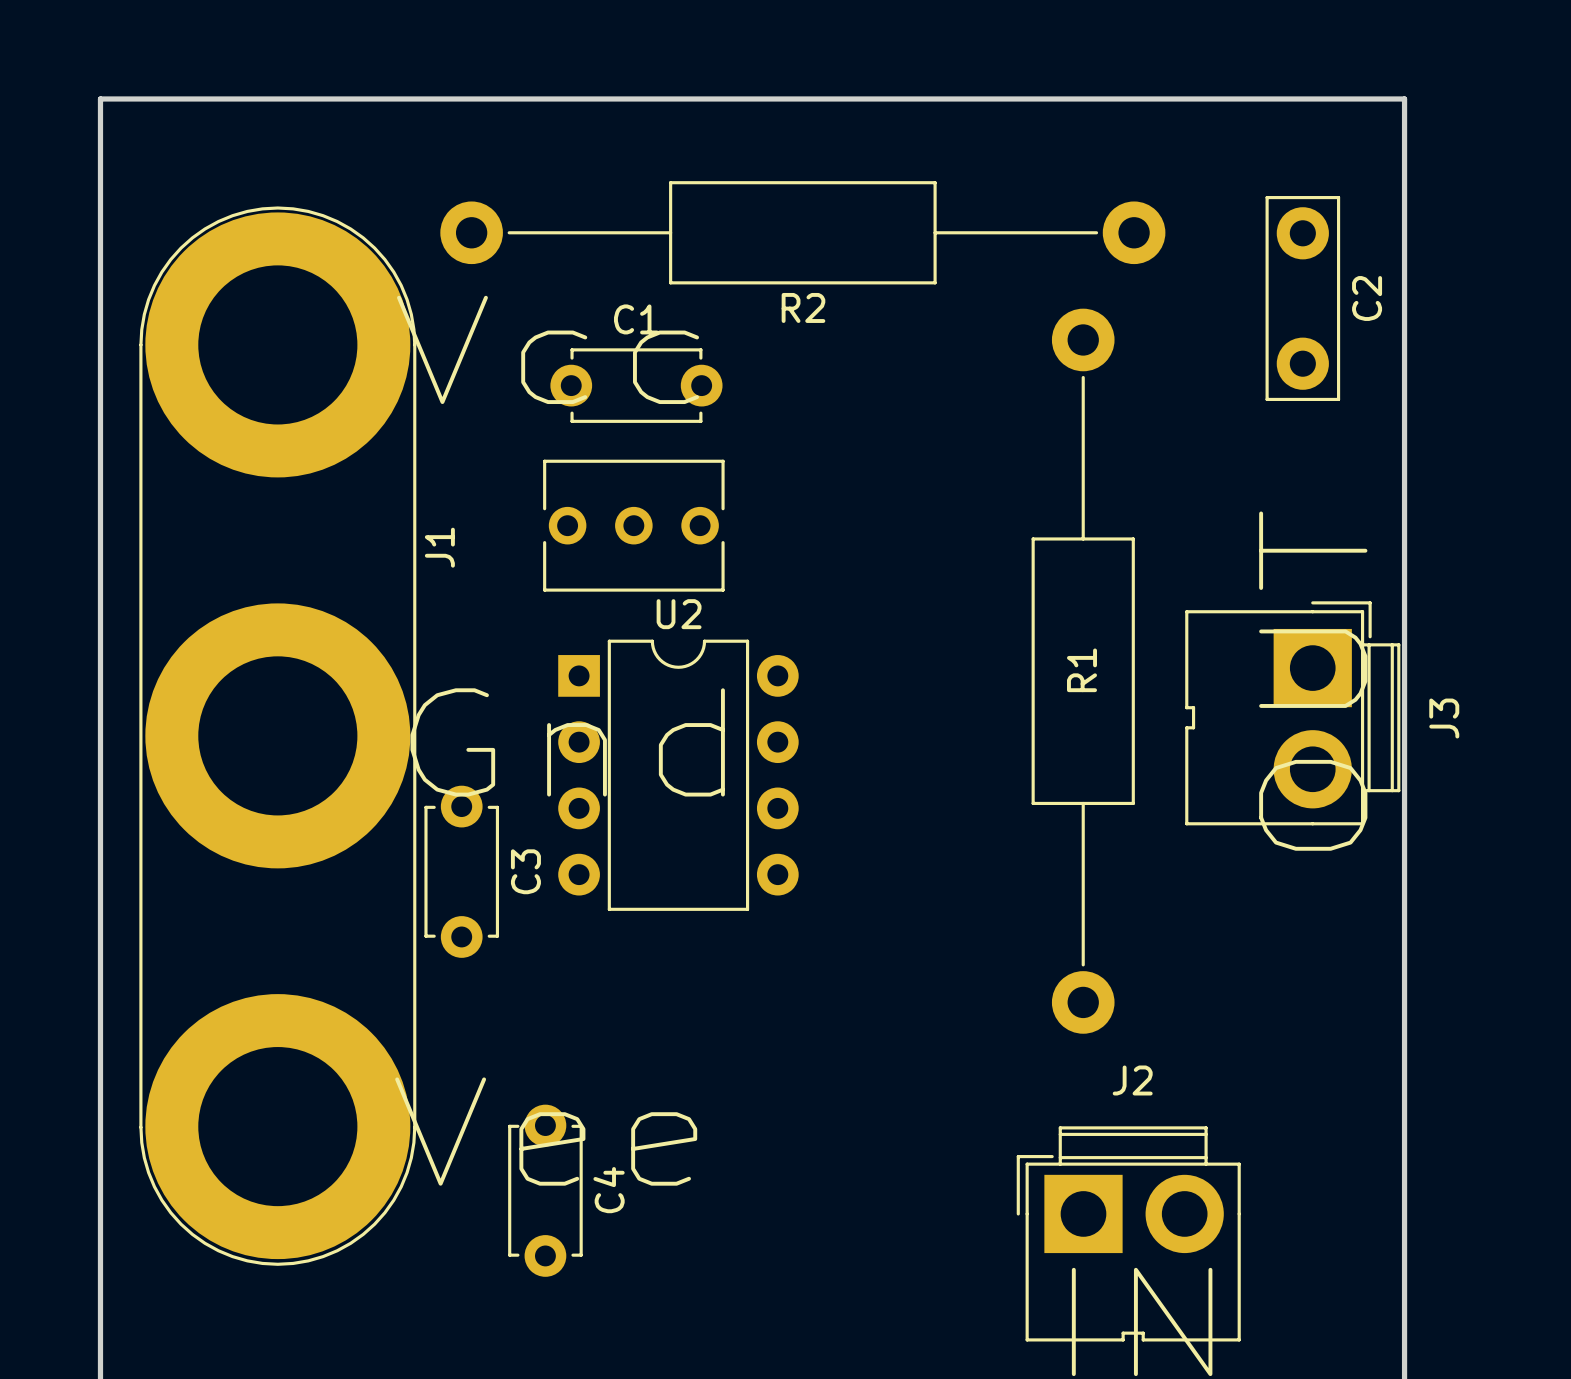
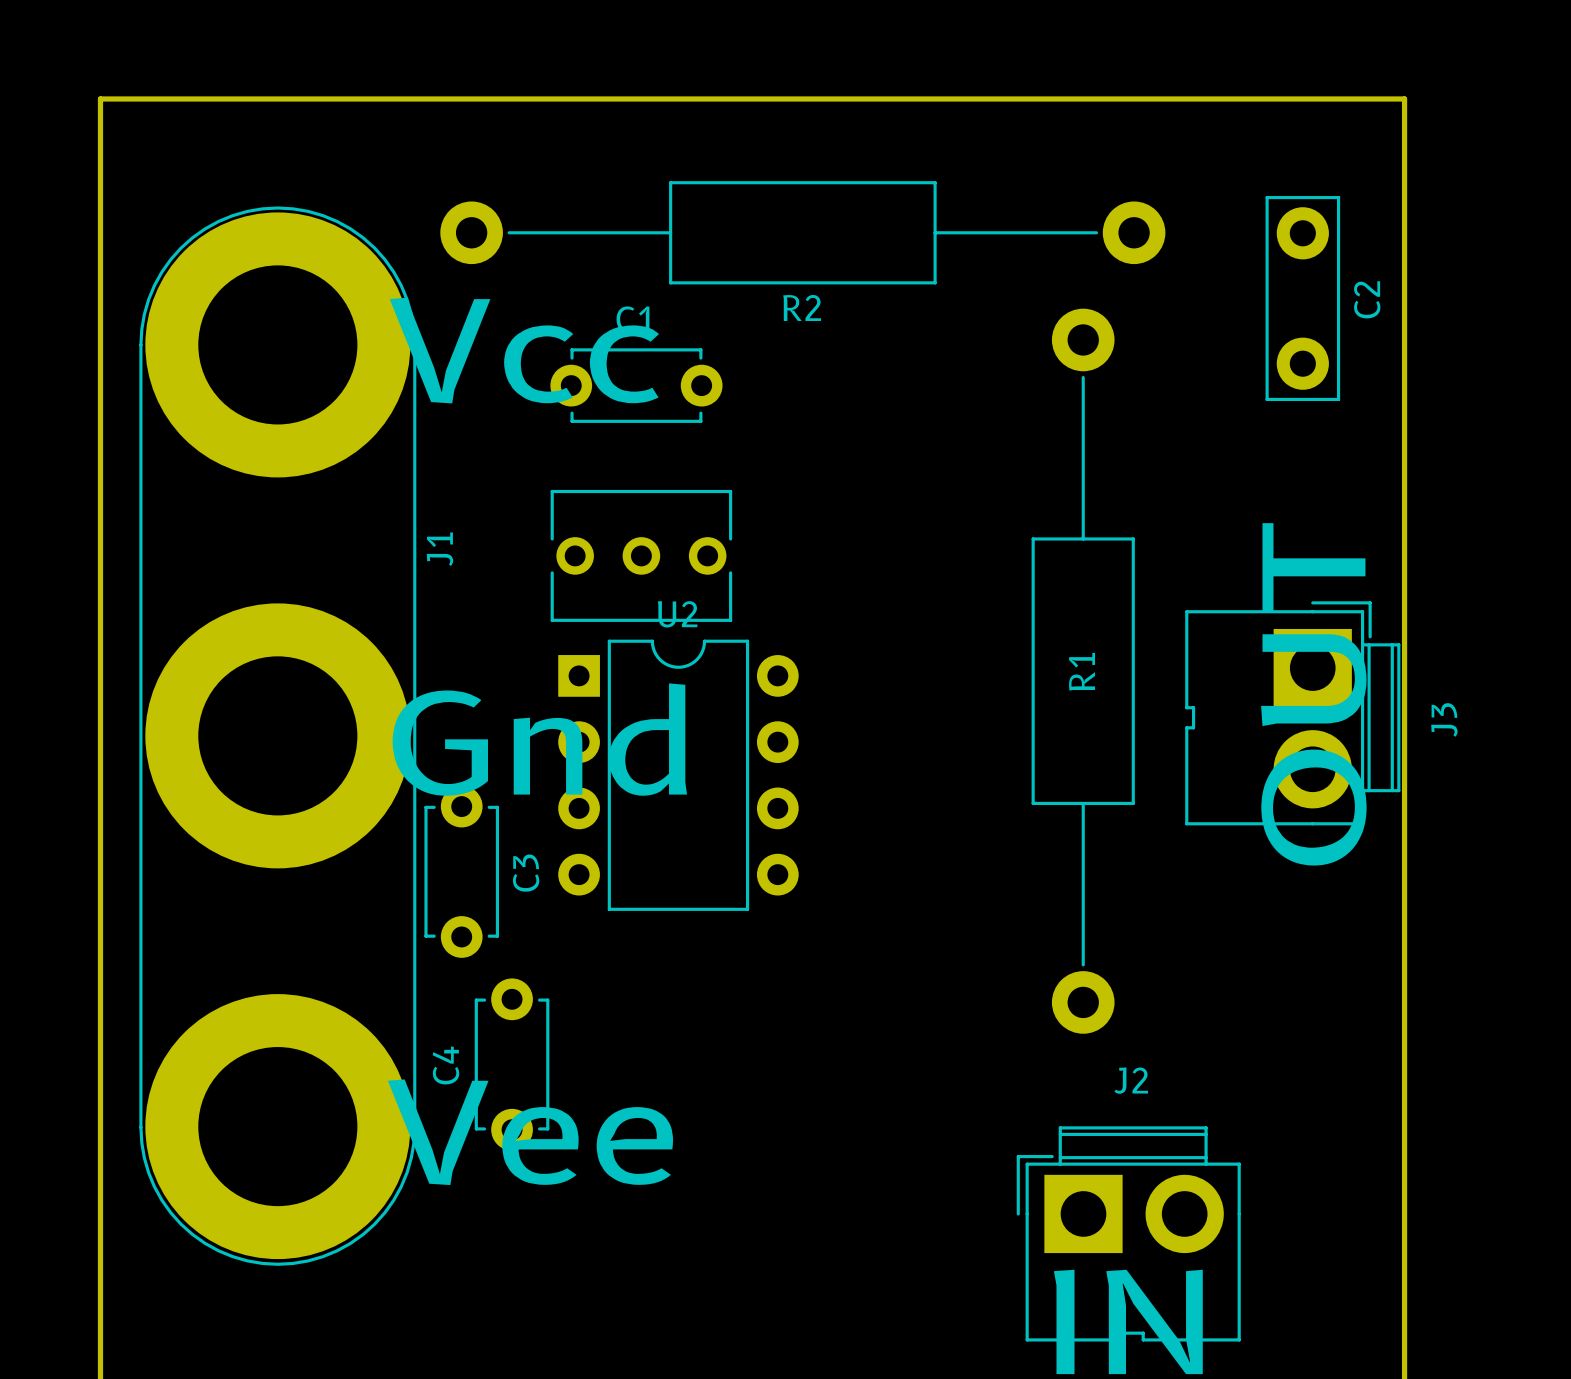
part position: (633, 525) -> (641, 555)
C4 position: (545, 1190) -> (512, 1064)
C4 name position: C4 (609, 1190) -> C4 (446, 1065)

